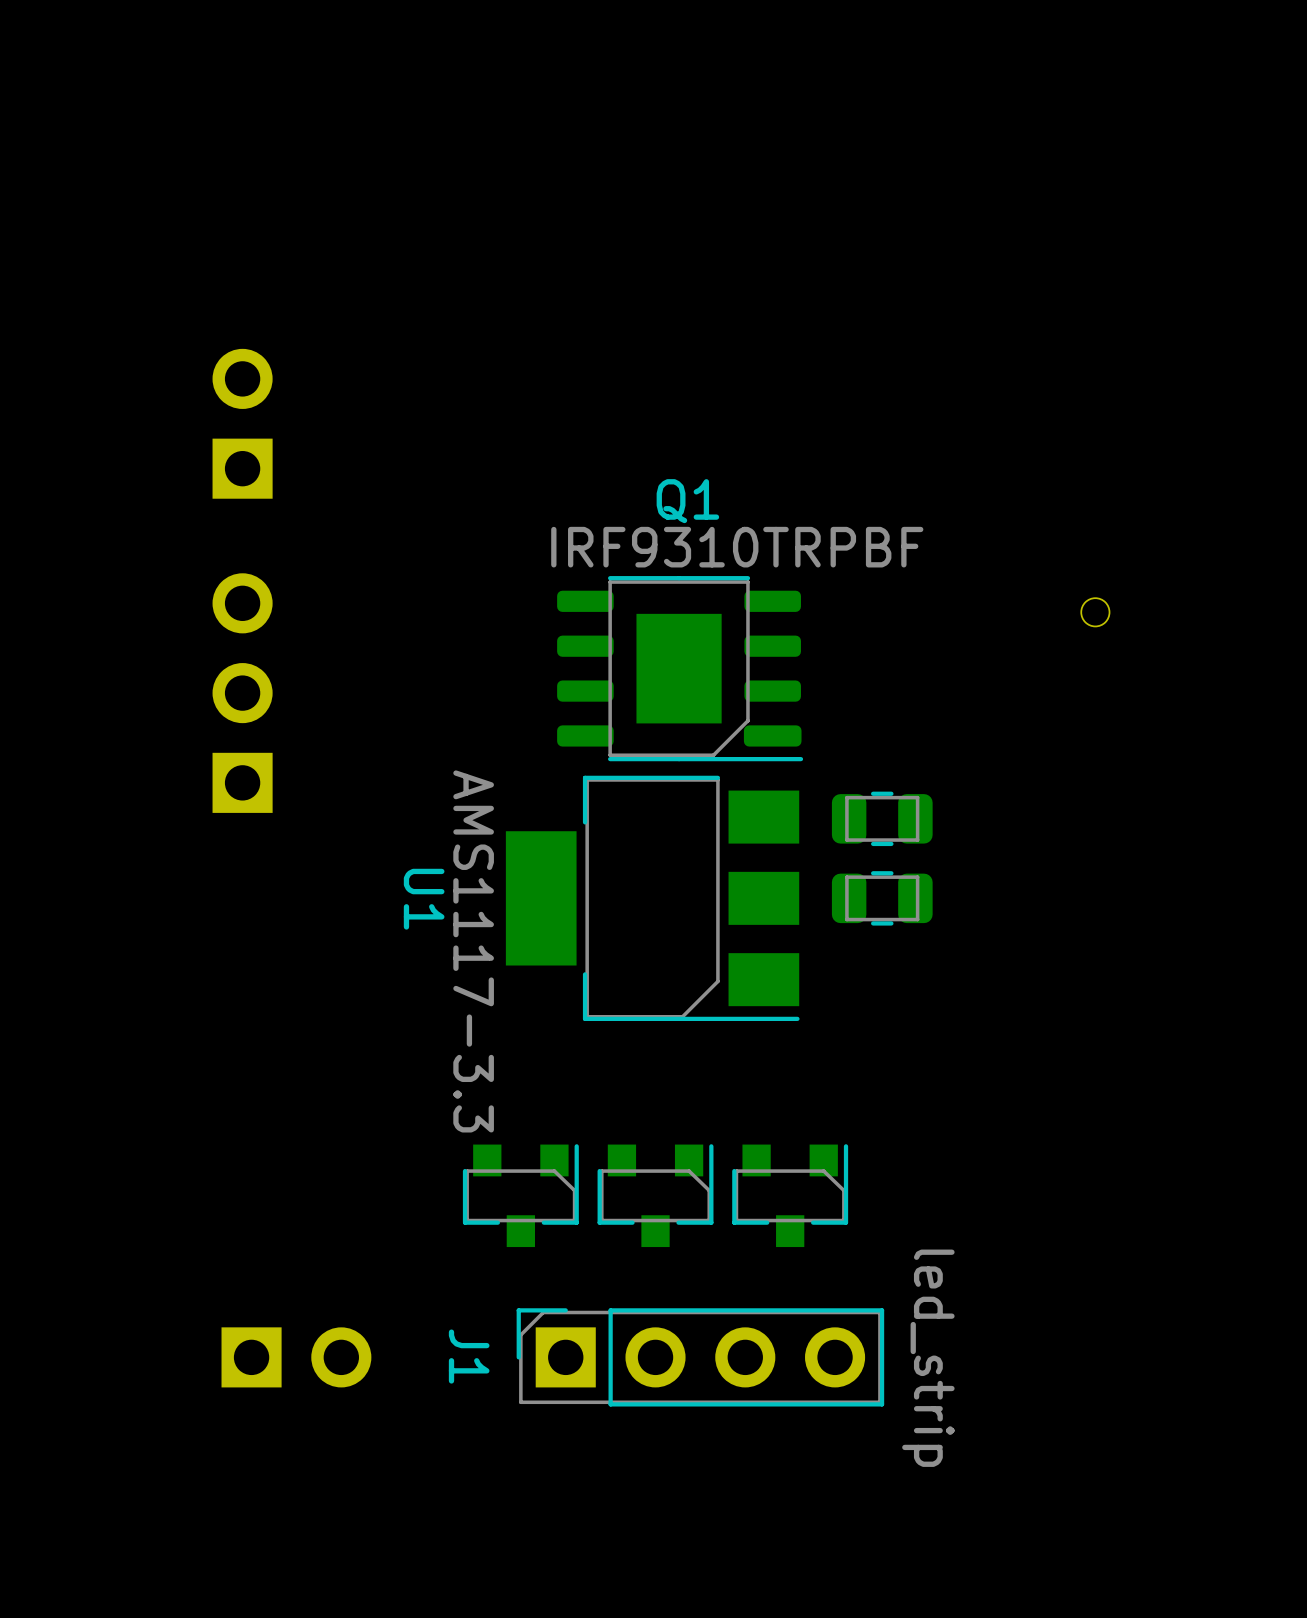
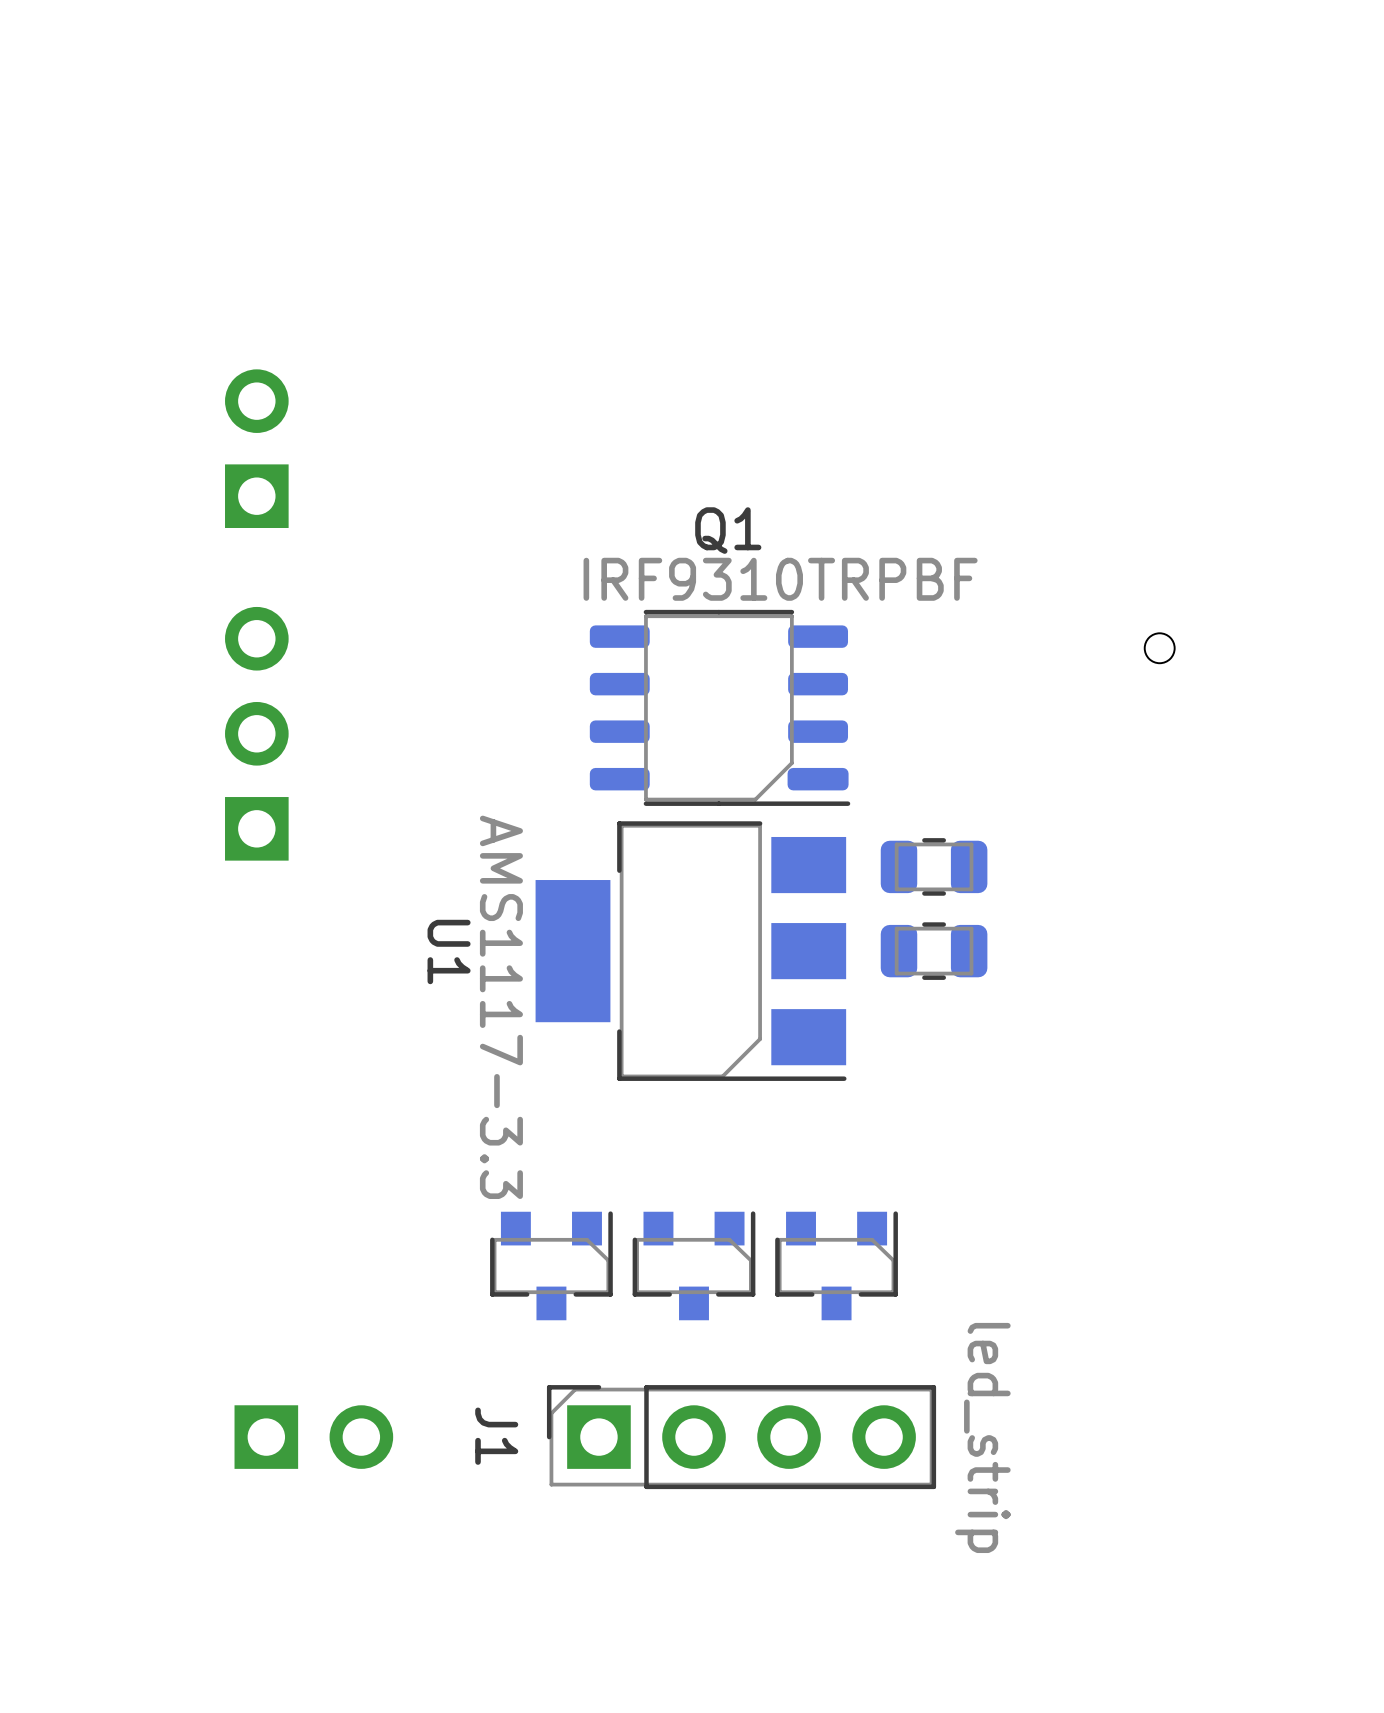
Q1 footprint: [557, 576, 804, 762] -> [589, 609, 851, 806]

